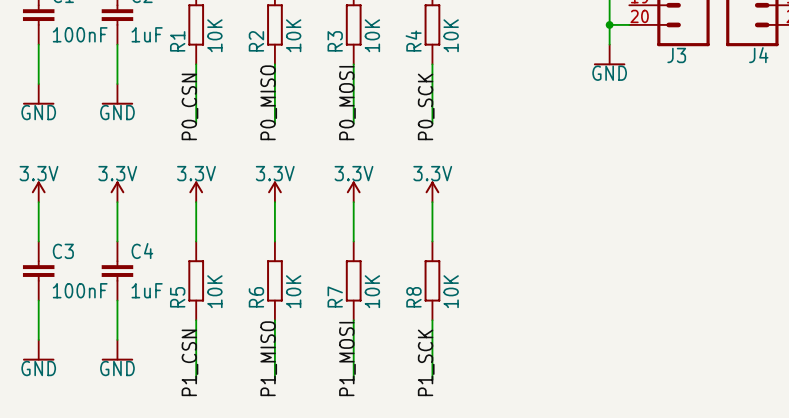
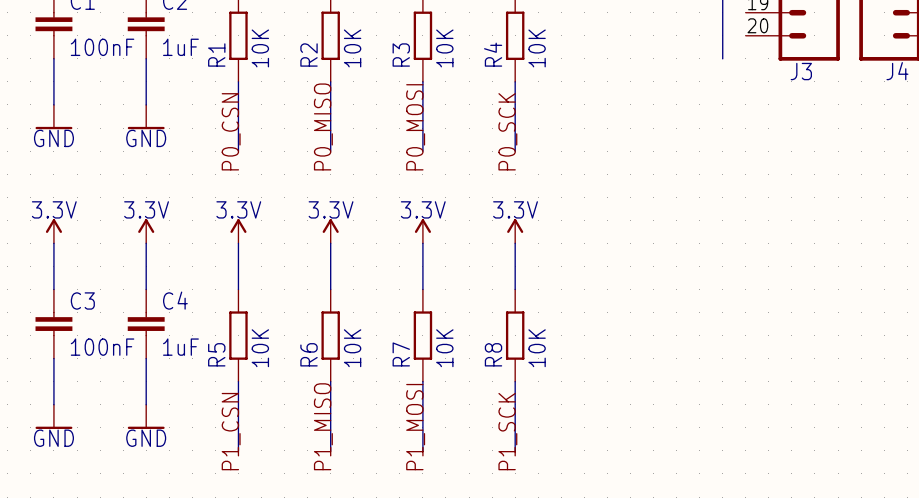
wire: (609, 24) (629, 24) -> none
junction: (609, 24) -> none
power symbol: GND (609, 54) -> none

